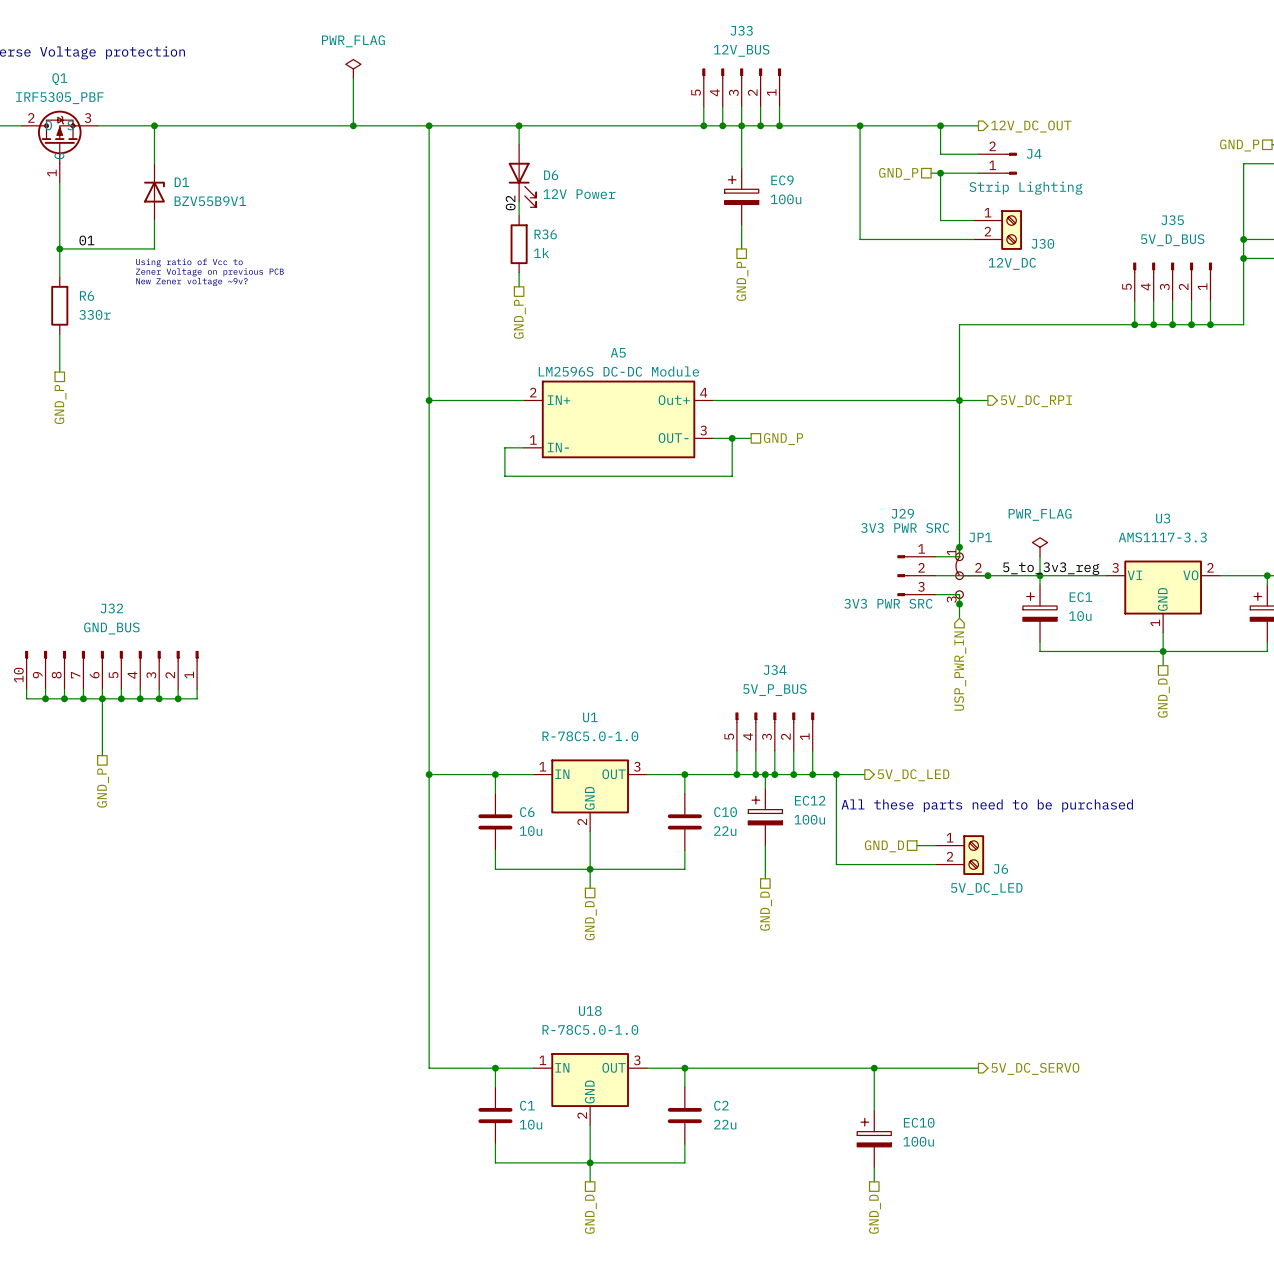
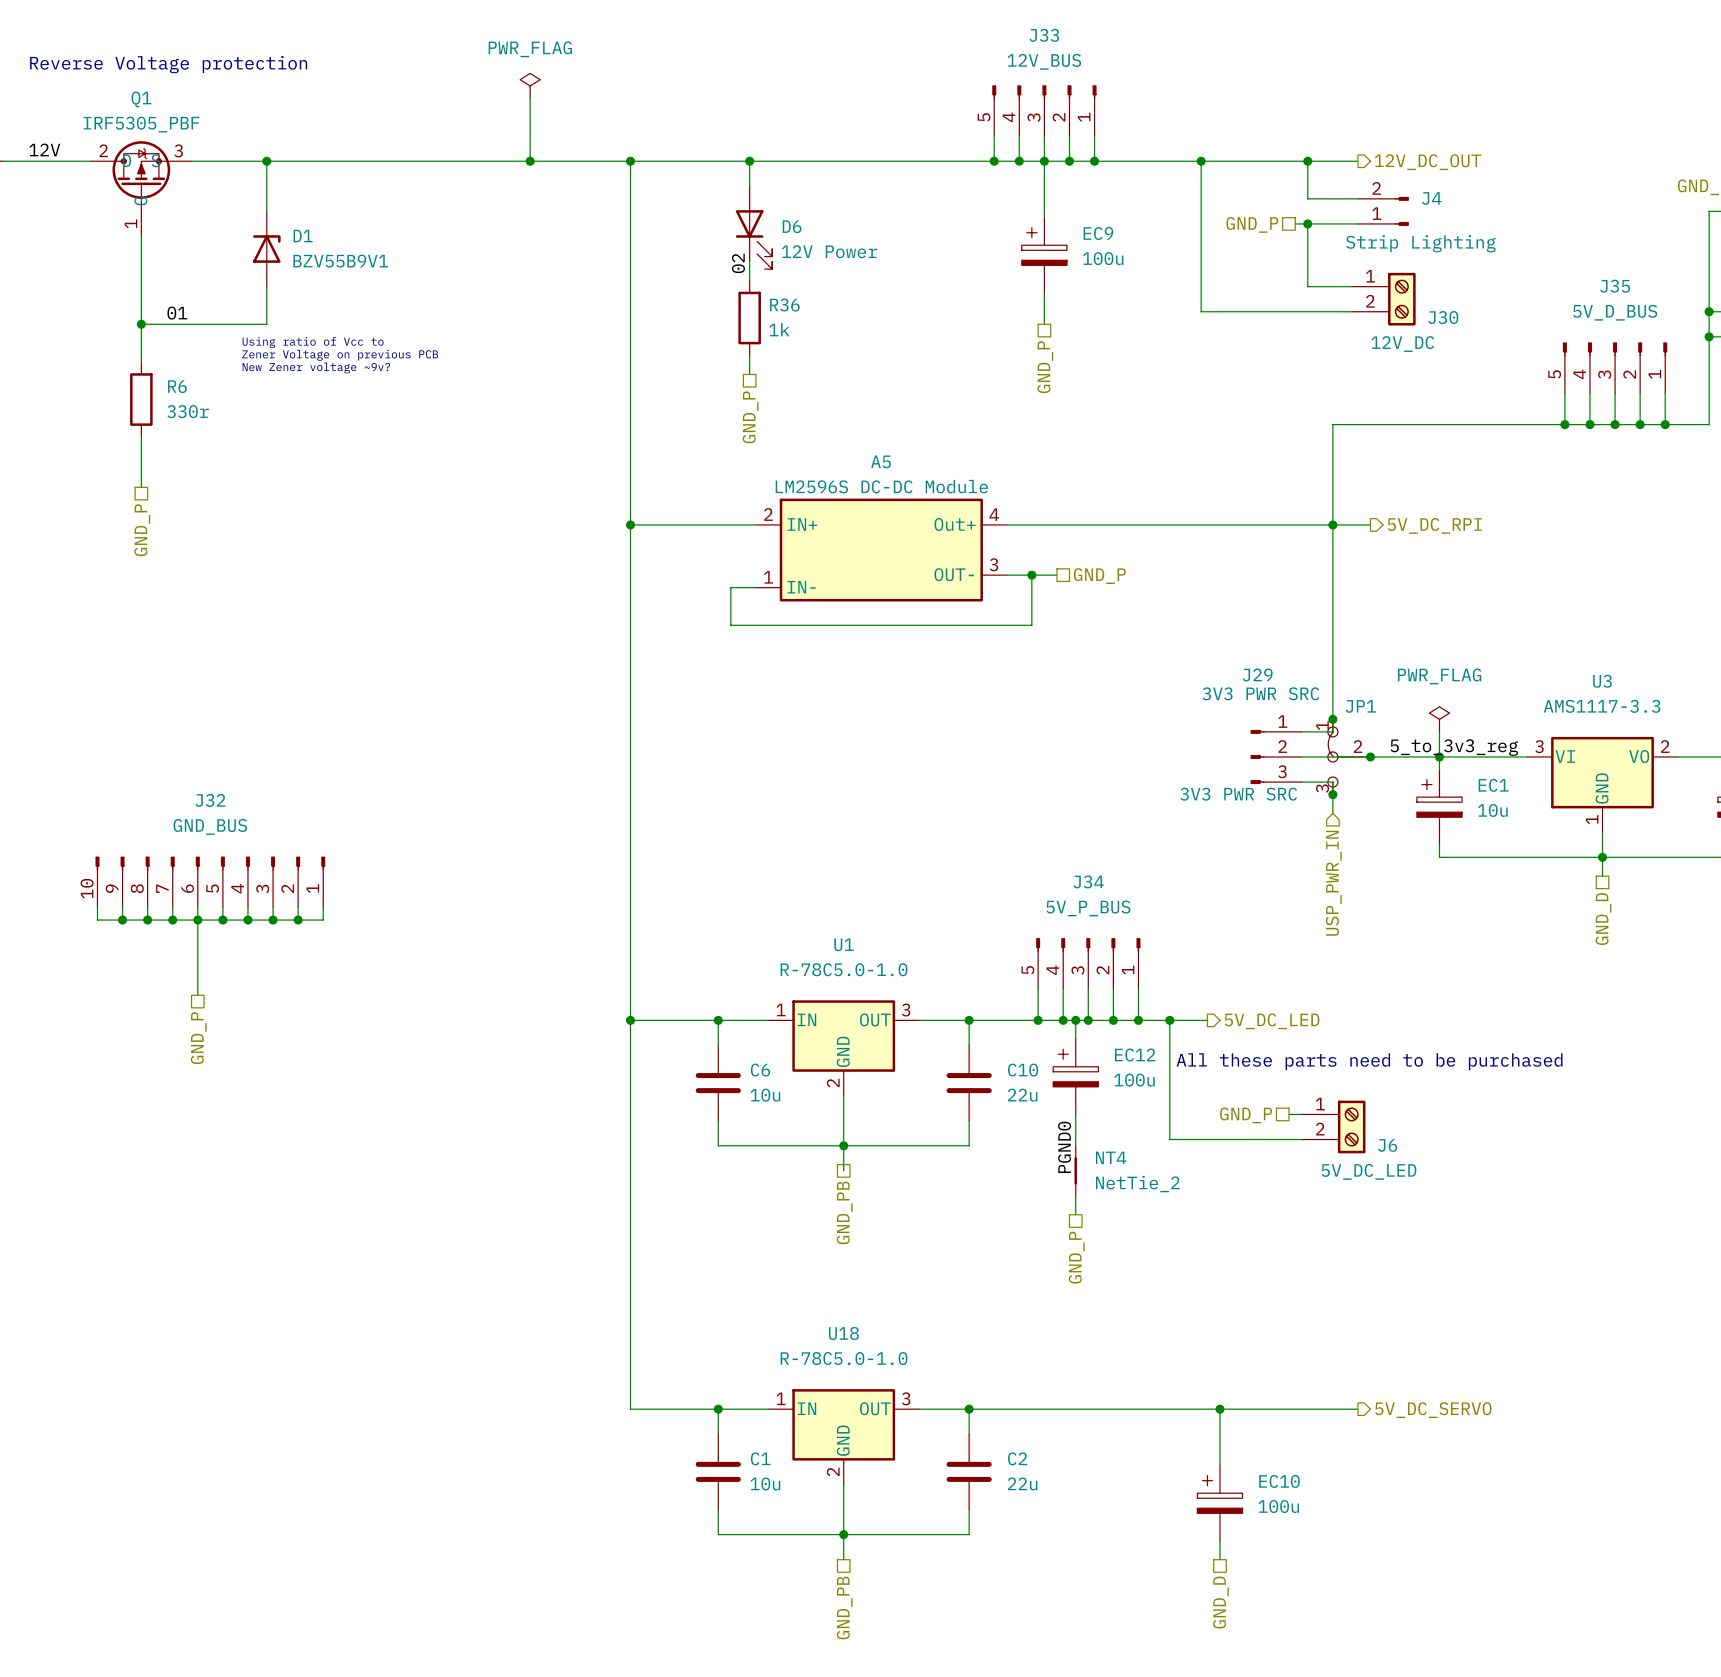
wire: (916, 845) (926, 845) -> none
hierarchical label: GND_D (884, 846) -> GND_P (1246, 1115)
label: none -> PGND0 (1064, 1147)
NT4: none -> NetTie_2 (1075, 1170)
wire: none -> (1075, 1195) (1075, 1214)
hierarchical label: GND_D (766, 911) -> GND_P (1076, 1257)
hierarchical label: GND_D (590, 920) -> GND_PB (844, 1212)
hierarchical label: GND_D (590, 1214) -> GND_PB (844, 1607)

